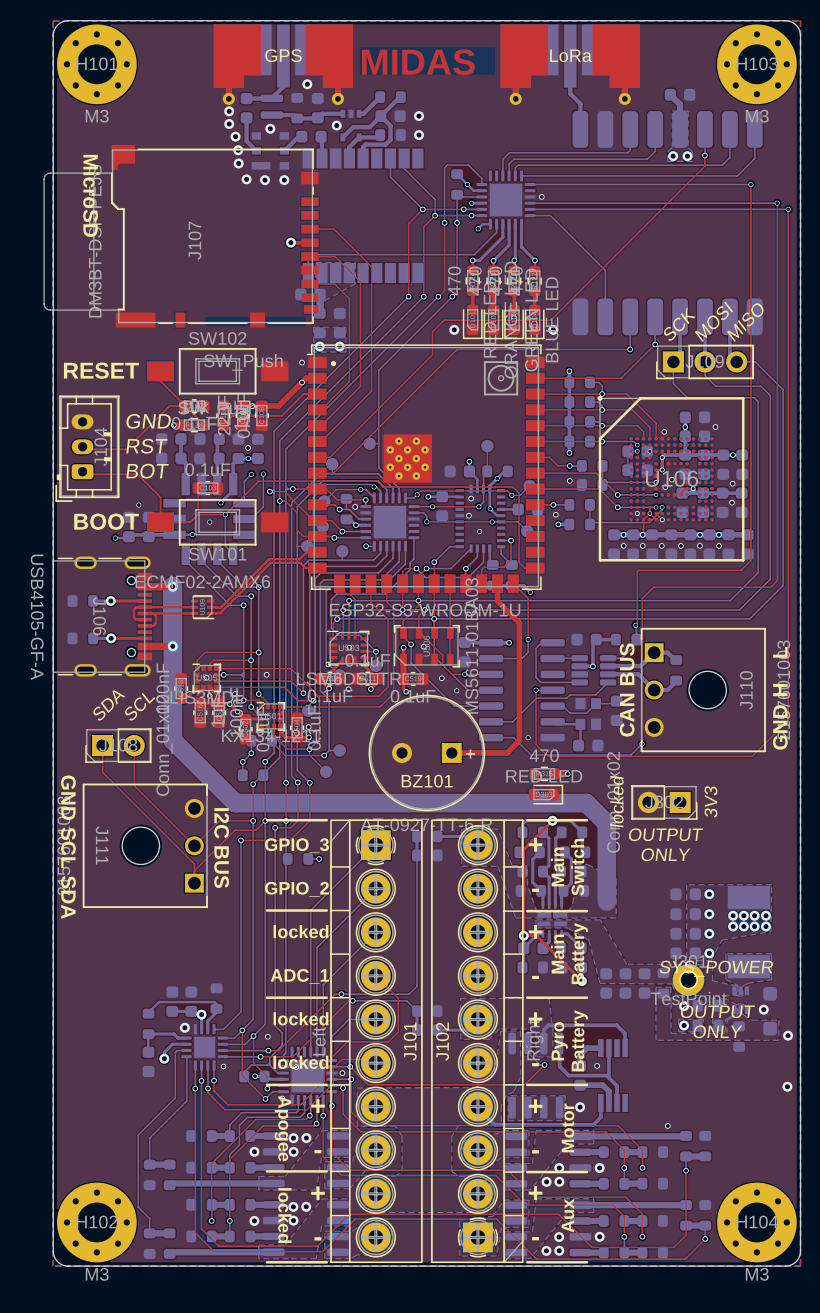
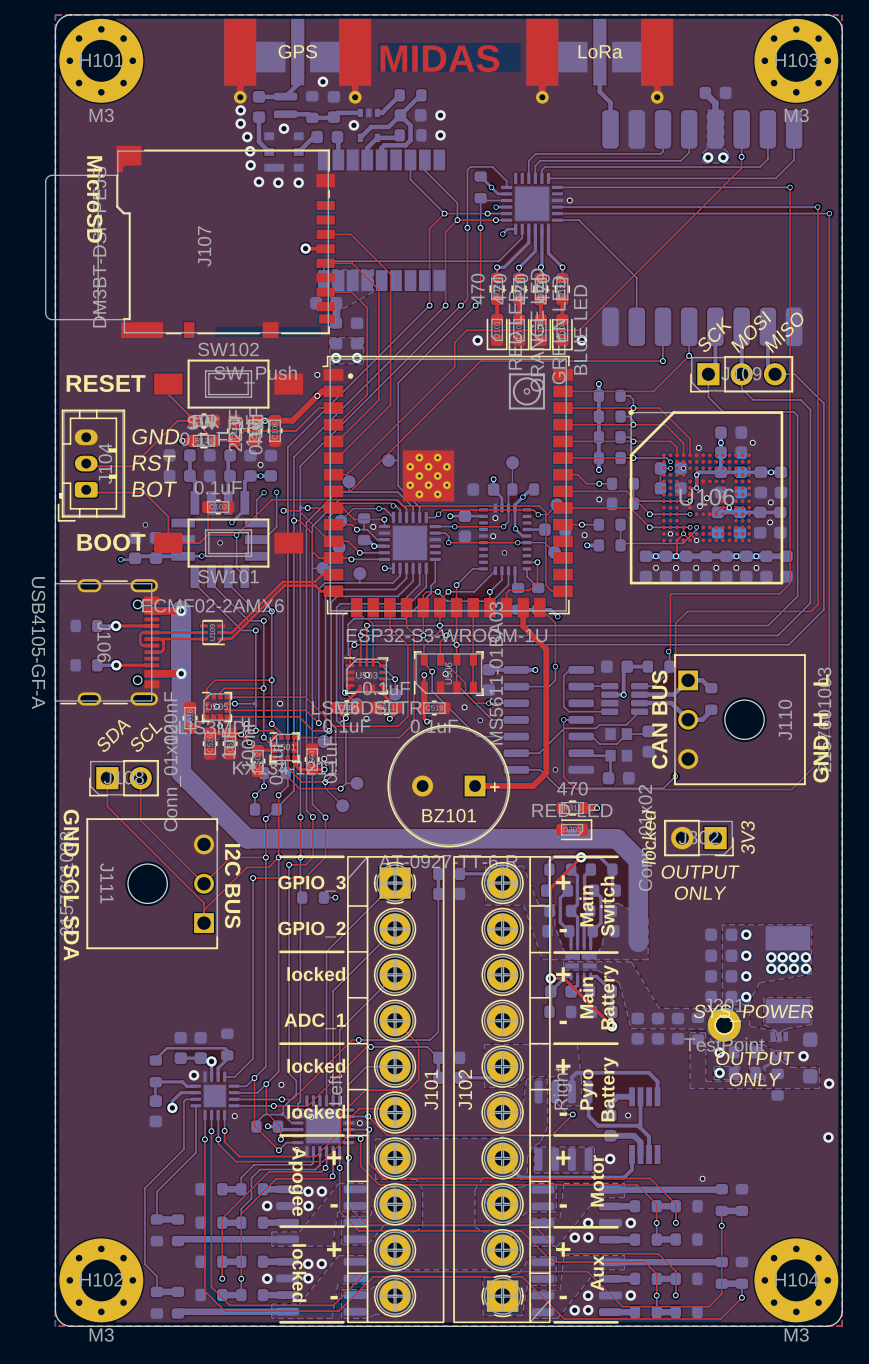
part footprint: [213, 24, 354, 105] -> [224, 18, 372, 104]
part footprint: [500, 24, 640, 105] -> [526, 18, 674, 104]

